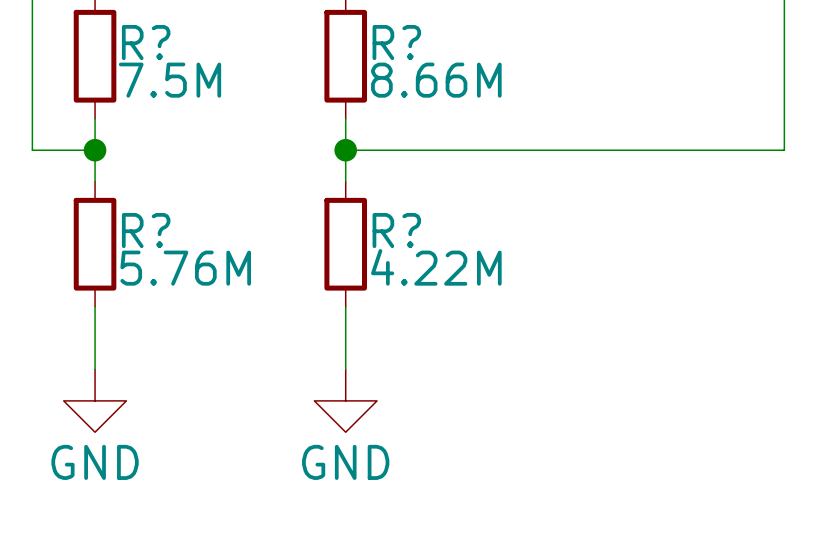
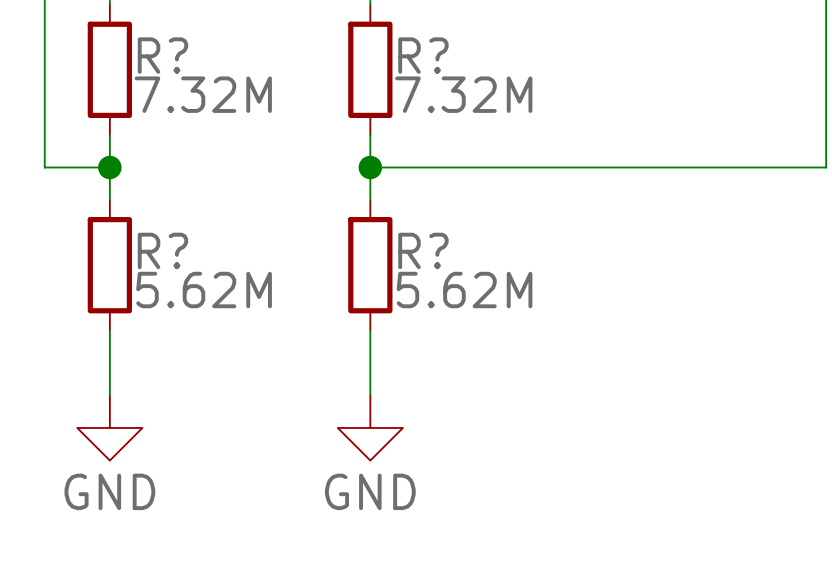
R? value: 7.5M (170, 80) -> 7.32M (203, 94)
R? value: 8.66M (436, 80) -> 7.32M (463, 94)
R? value: 4.22M (436, 267) -> 5.62M (464, 290)
R? value: 5.76M (185, 268) -> 5.62M (204, 290)

